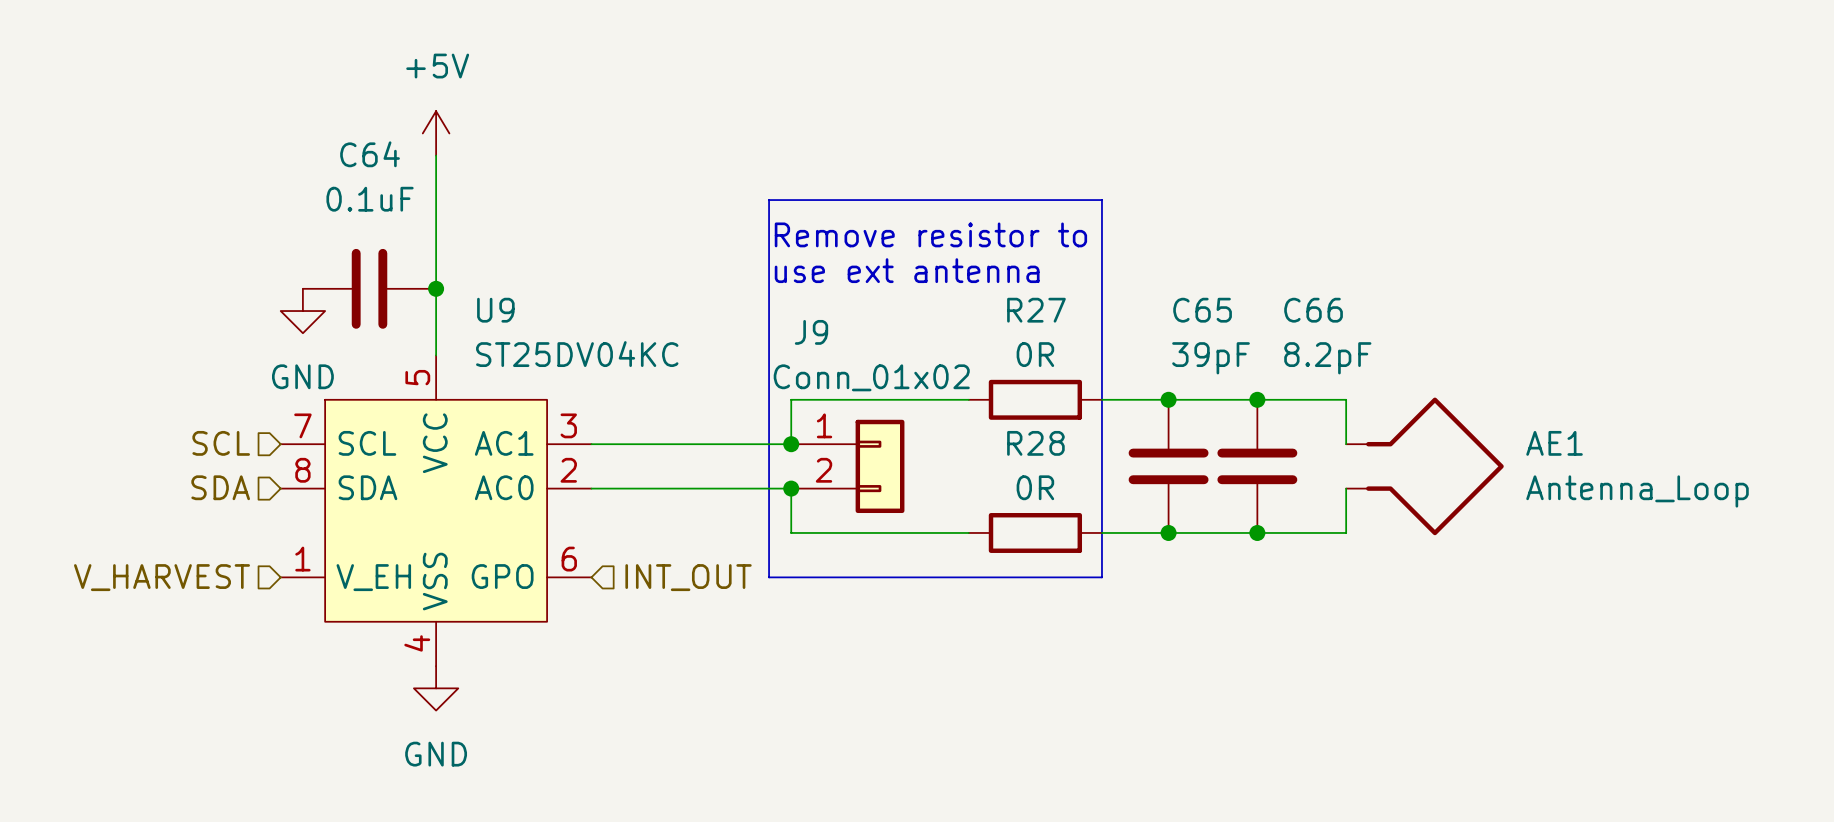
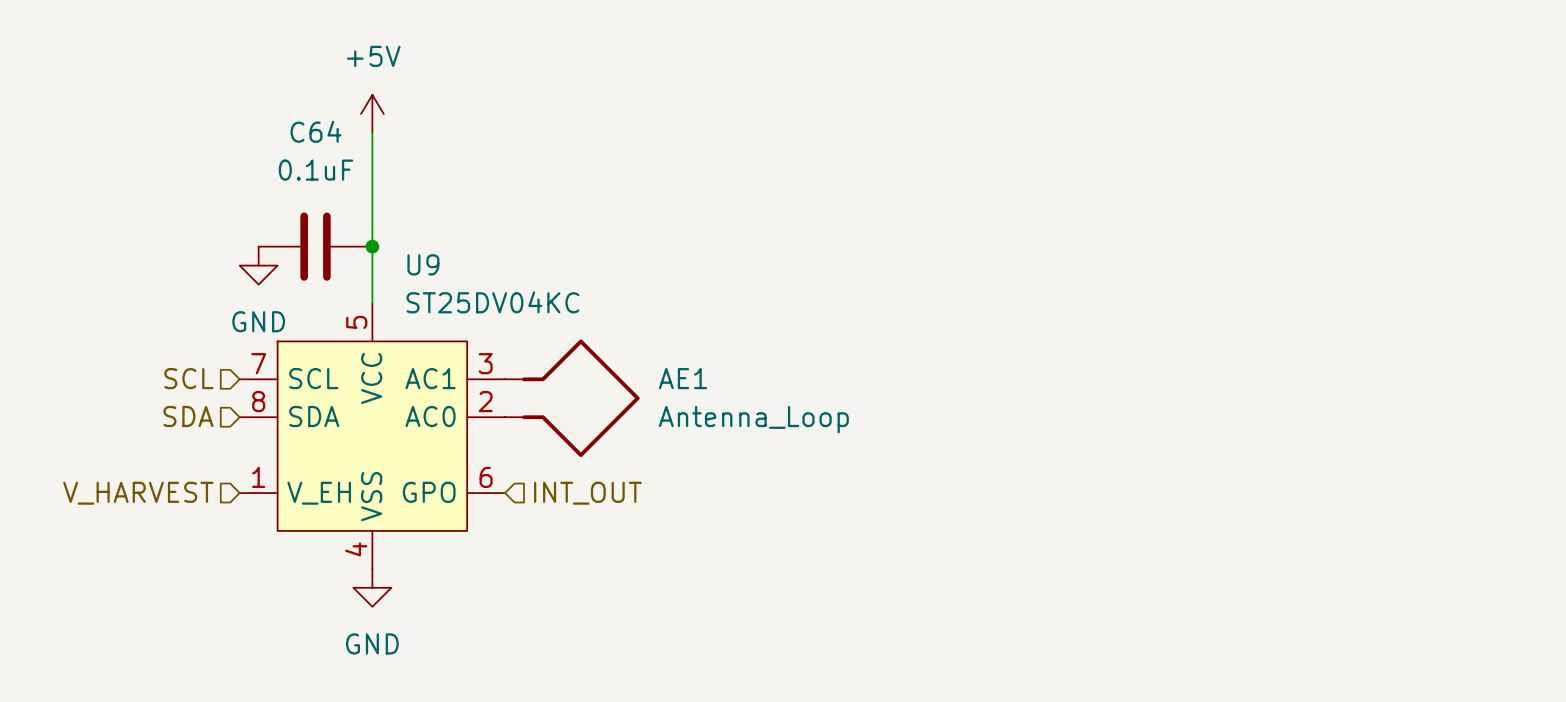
line: (769, 200) (1101, 200) (1101, 577) (769, 577) (769, 200) -> none
text: Remove resistor to (930, 234) -> none
text: use ext antenna (907, 270) -> none
wire: (968, 399) (791, 399) (791, 444) (591, 444) -> none
R27: 0R (1035, 399) -> none
wire: (1101, 399) (1346, 399) (1346, 444) -> none
junction: (1168, 399) -> none
junction: (1257, 399) -> none
junction: (791, 444) -> none
J9: Conn_01x02 (847, 466) -> none
C65: 39pF (1168, 466) -> none
C66: 8.2pF (1257, 466) -> none
AE1 position: (1424, 466) -> (572, 398)
wire: (591, 488) (791, 488) (791, 532) (968, 532) -> none
junction: (791, 488) -> none
wire: (1346, 488) (1346, 532) (1101, 532) -> none
R28: 0R (1035, 532) -> none
junction: (1168, 532) -> none
junction: (1257, 532) -> none

